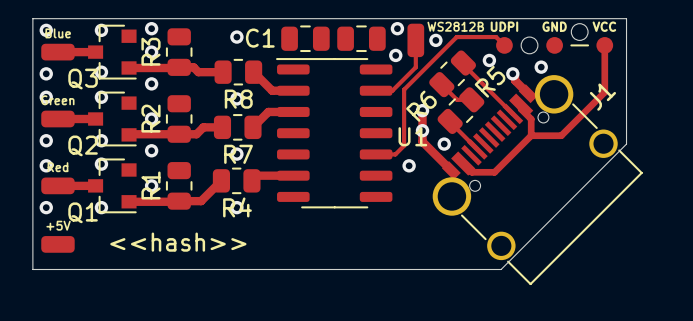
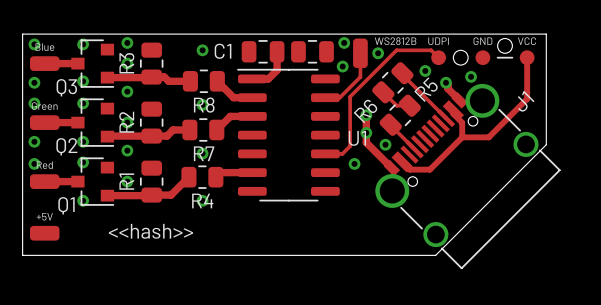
track: none -> (277, 51) (277, 70) (268, 78) (252, 78)
via: (46, 207) -> none

